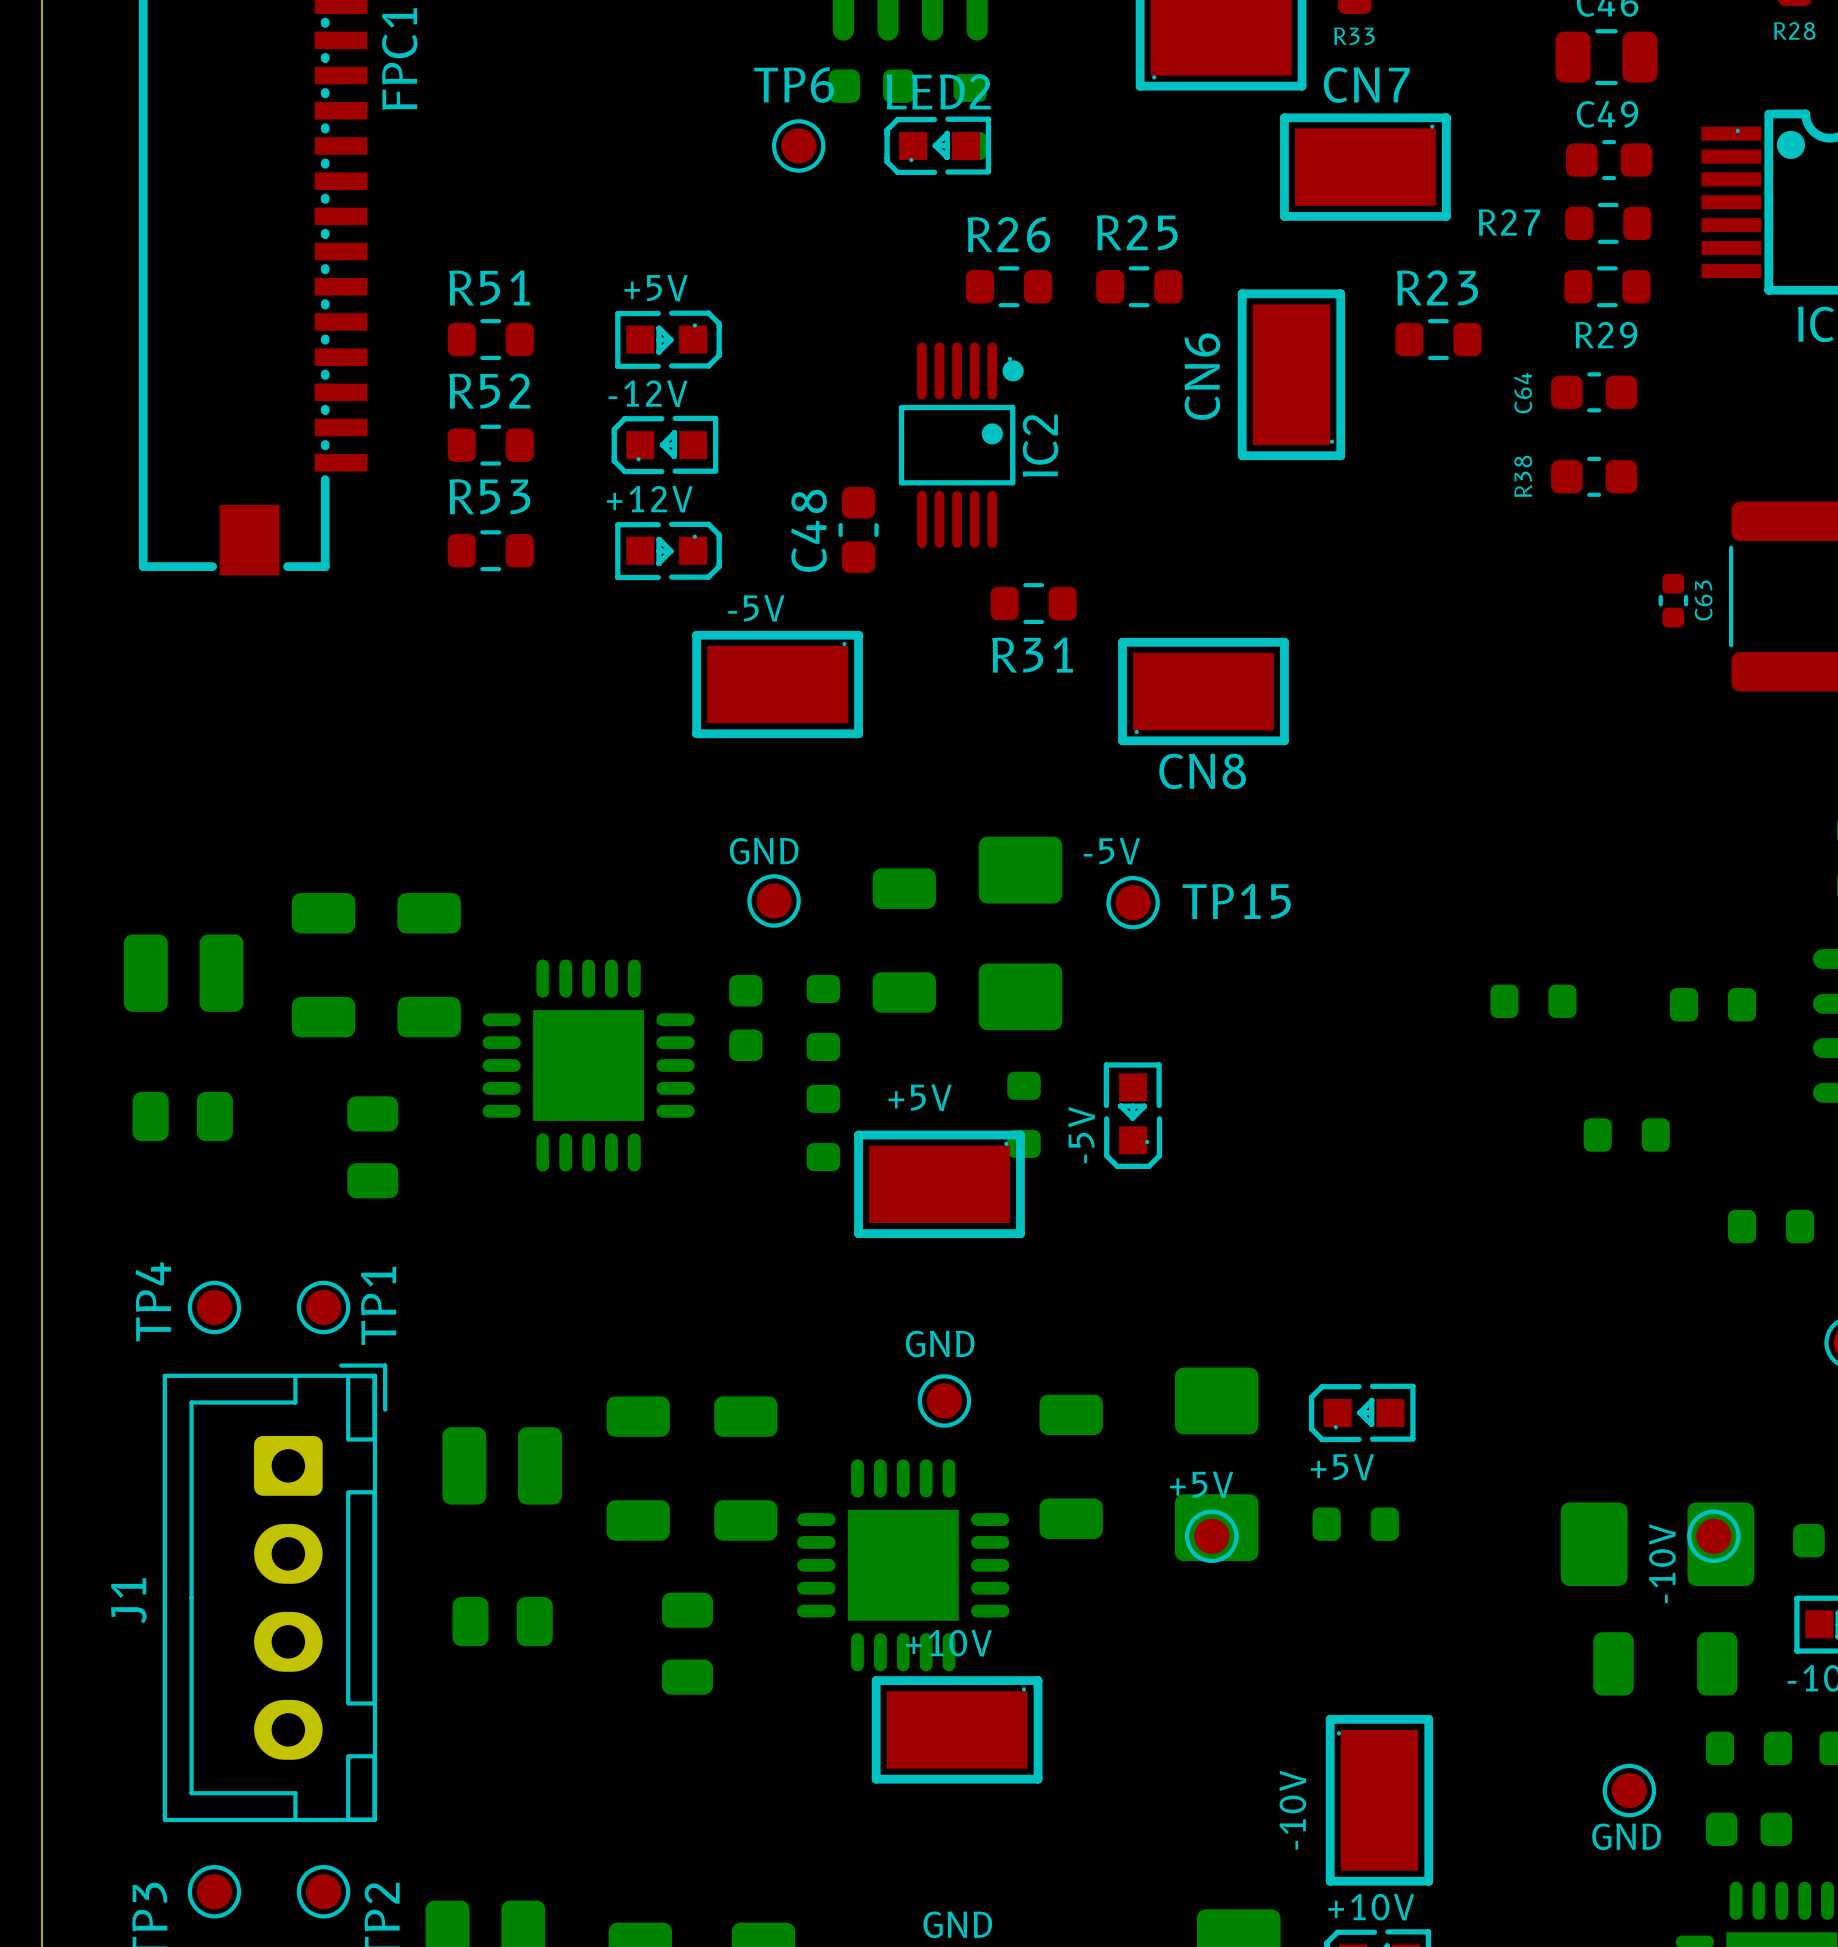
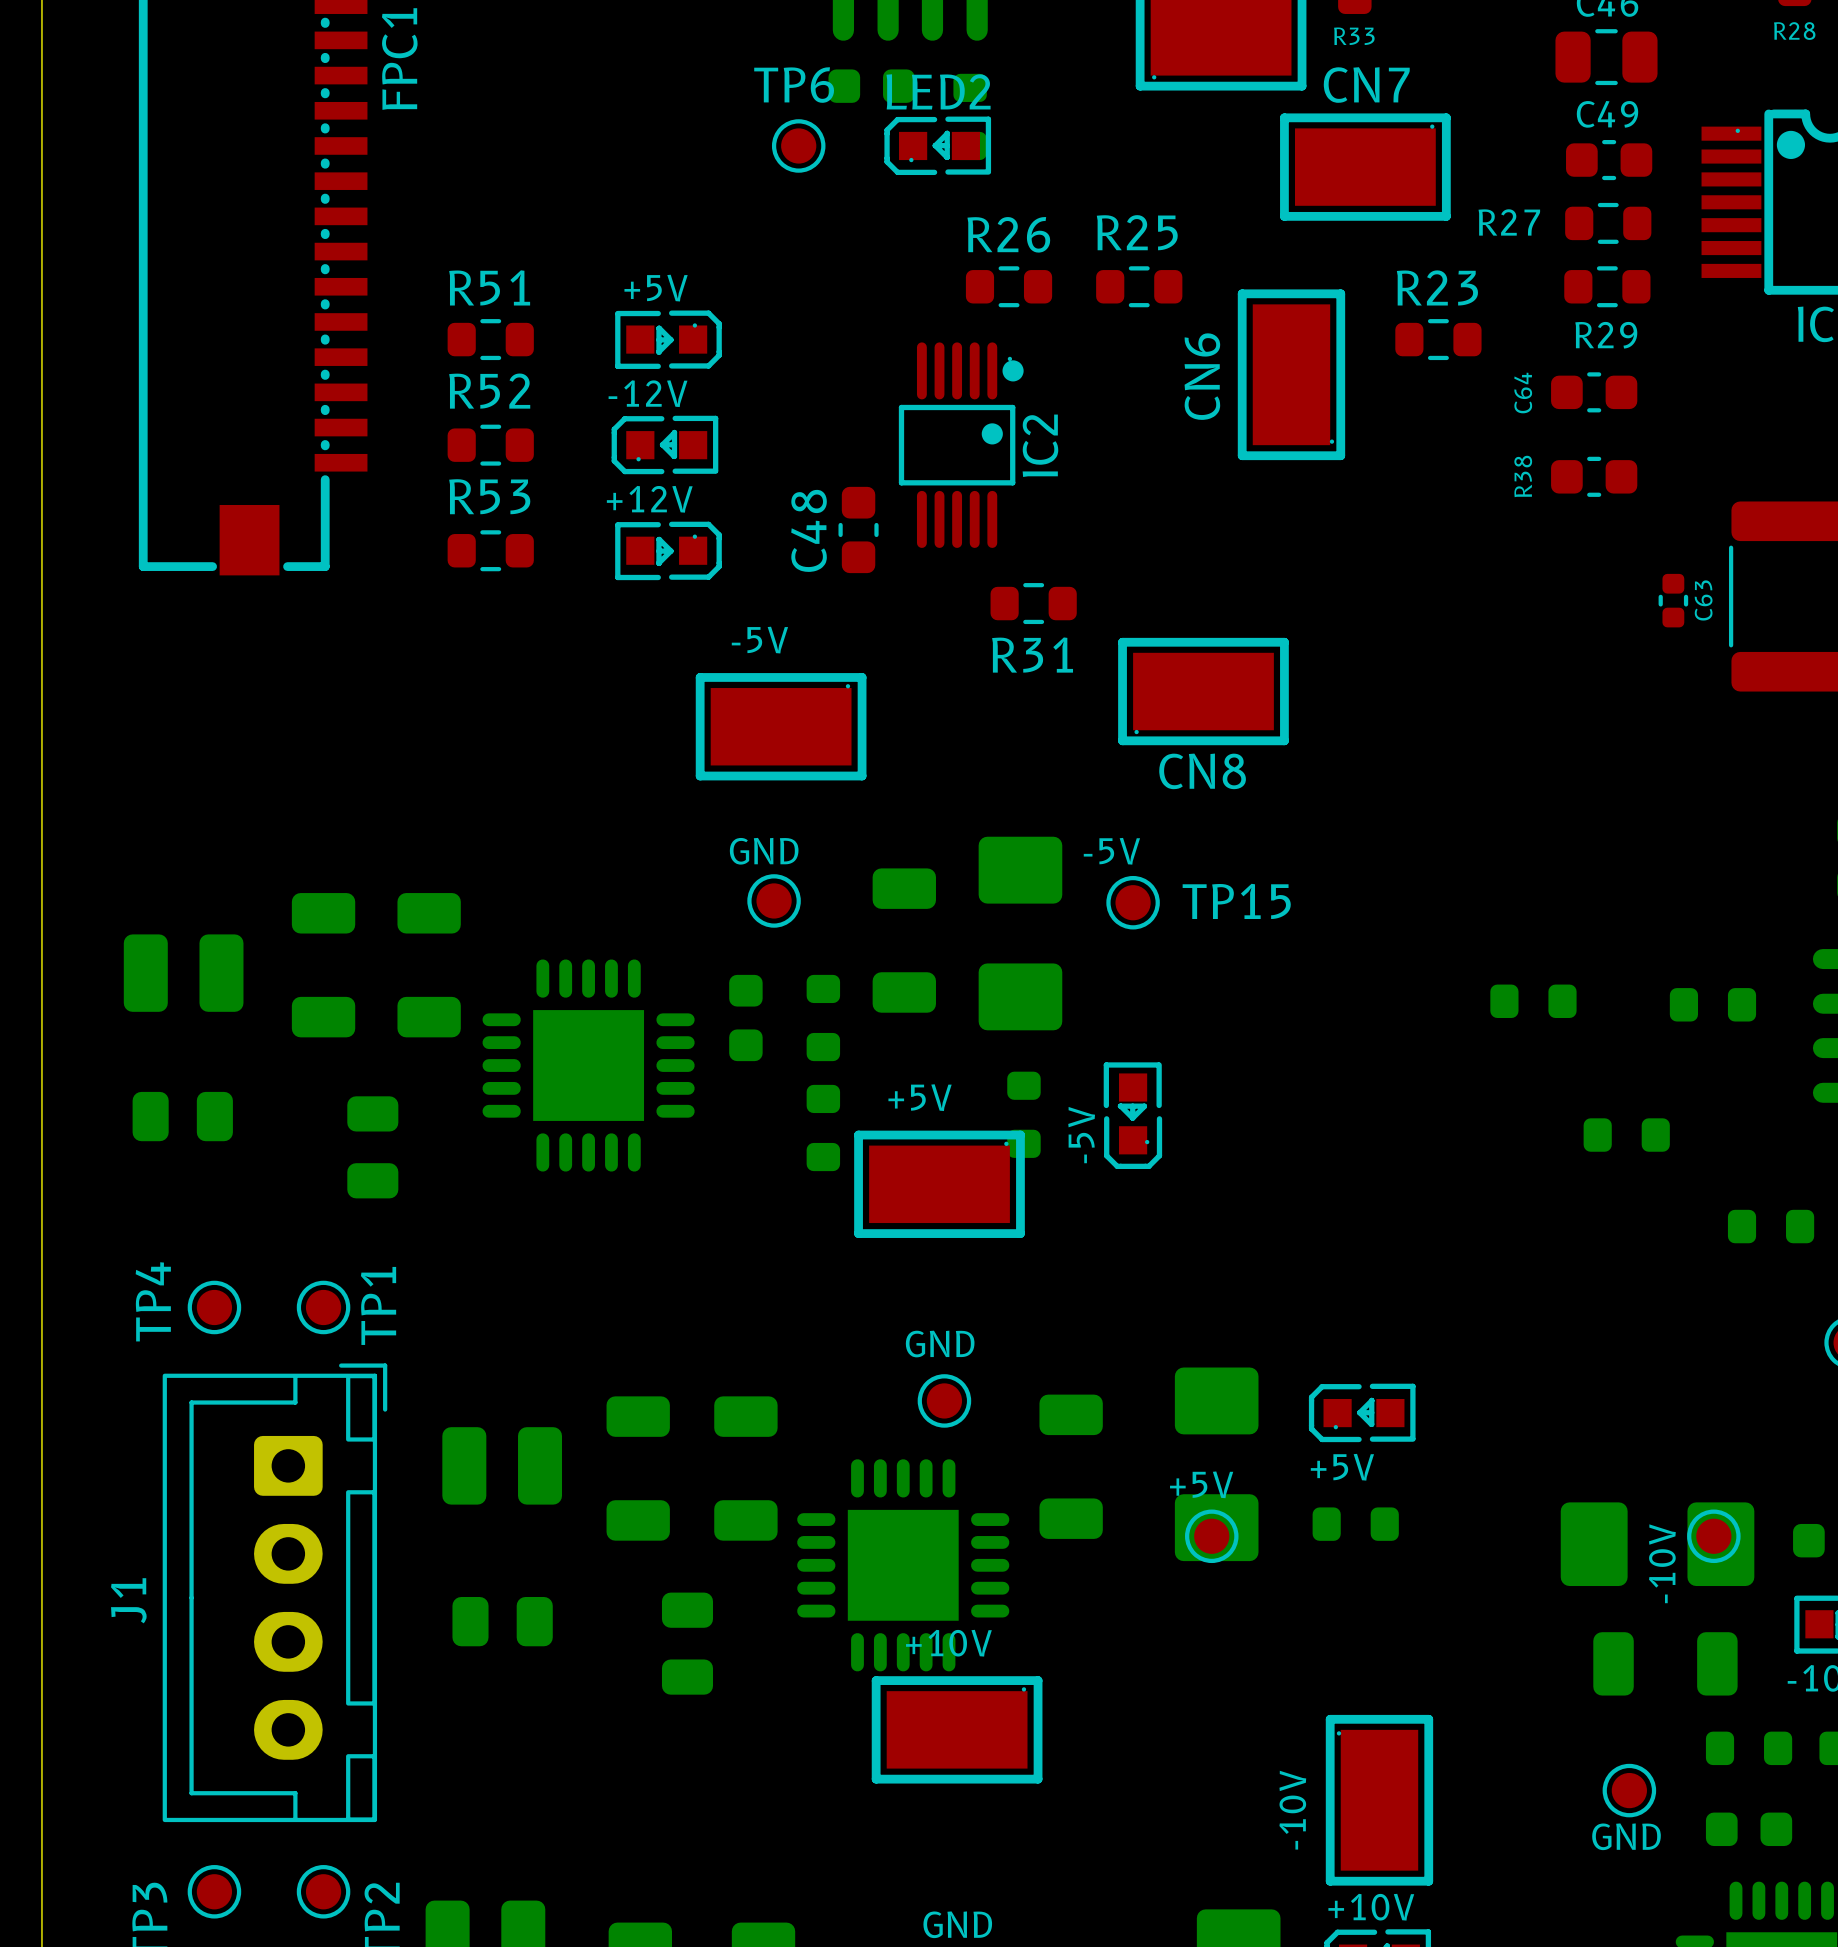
text position: -5V (756, 608) -> -5V (759, 640)
part position: (777, 684) -> (781, 726)

